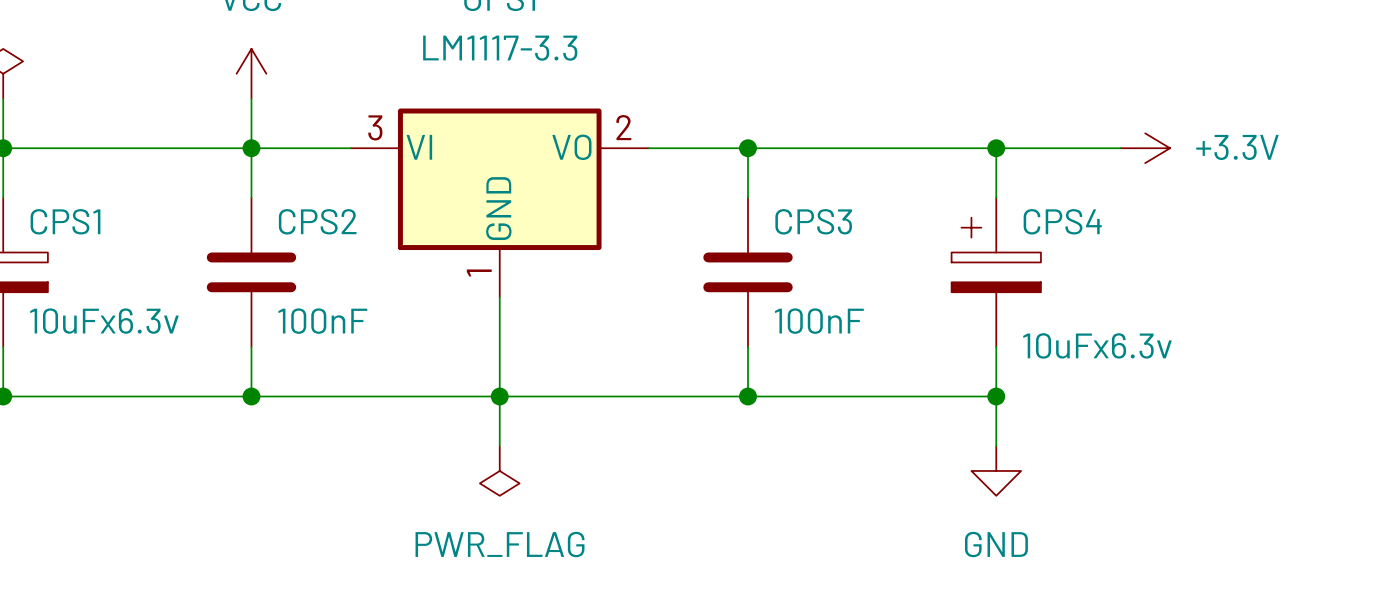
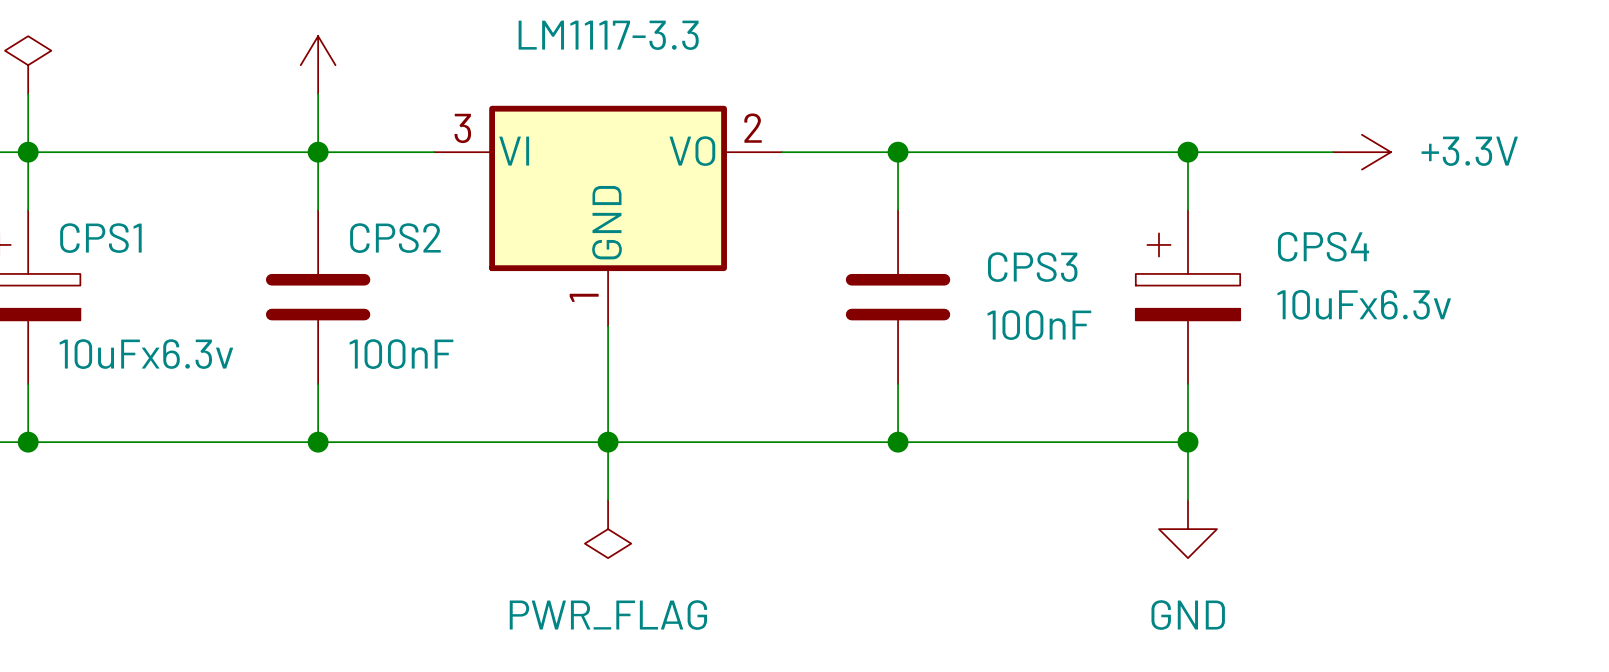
CPS3 name position: CPS3 (813, 221) -> CPS3 (1032, 267)
CPS4 name position: CPS4 (1062, 221) -> CPS4 (1323, 246)
CPS3 value position: 100nF (819, 321) -> 100nF (1039, 325)
CPS4 value position: 10uFx6.3v (1097, 345) -> 10uFx6.3v (1364, 304)

